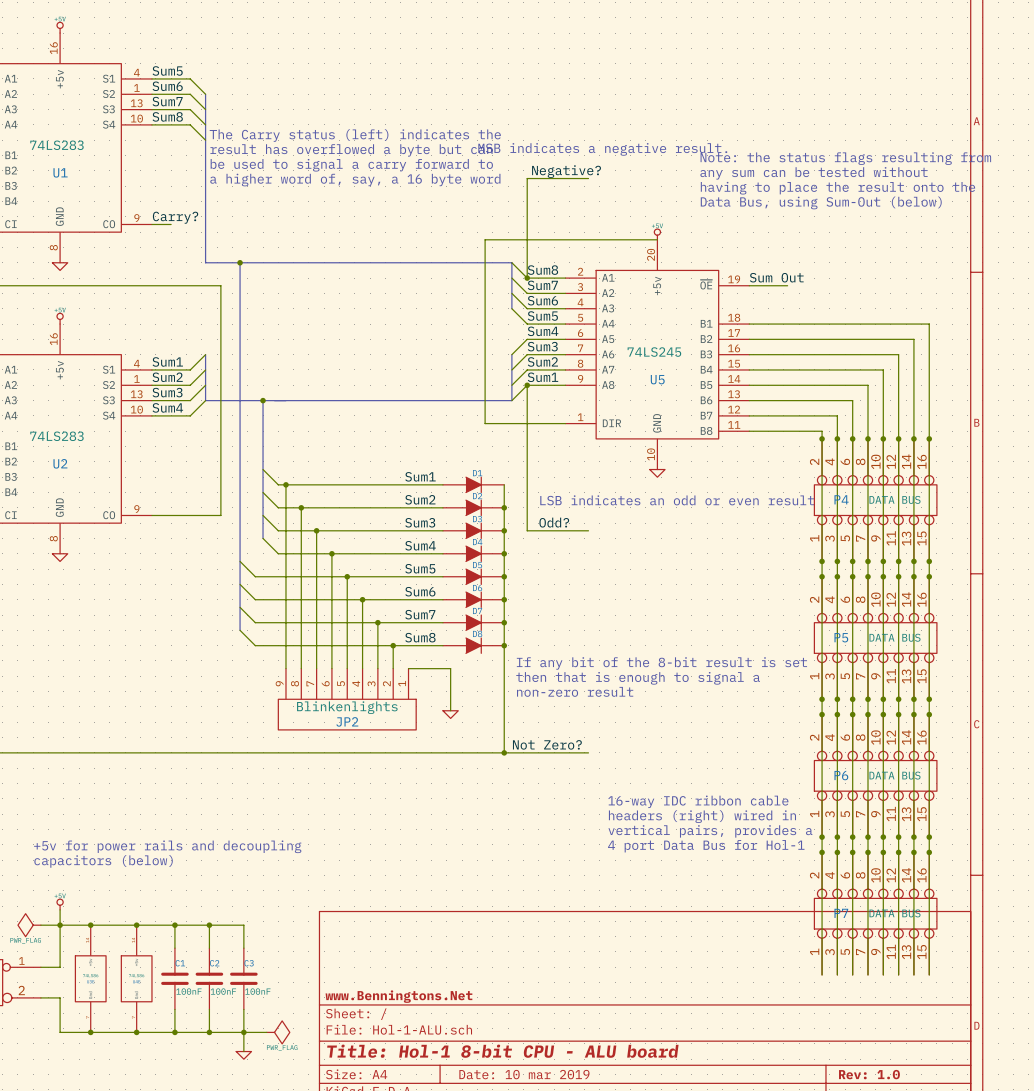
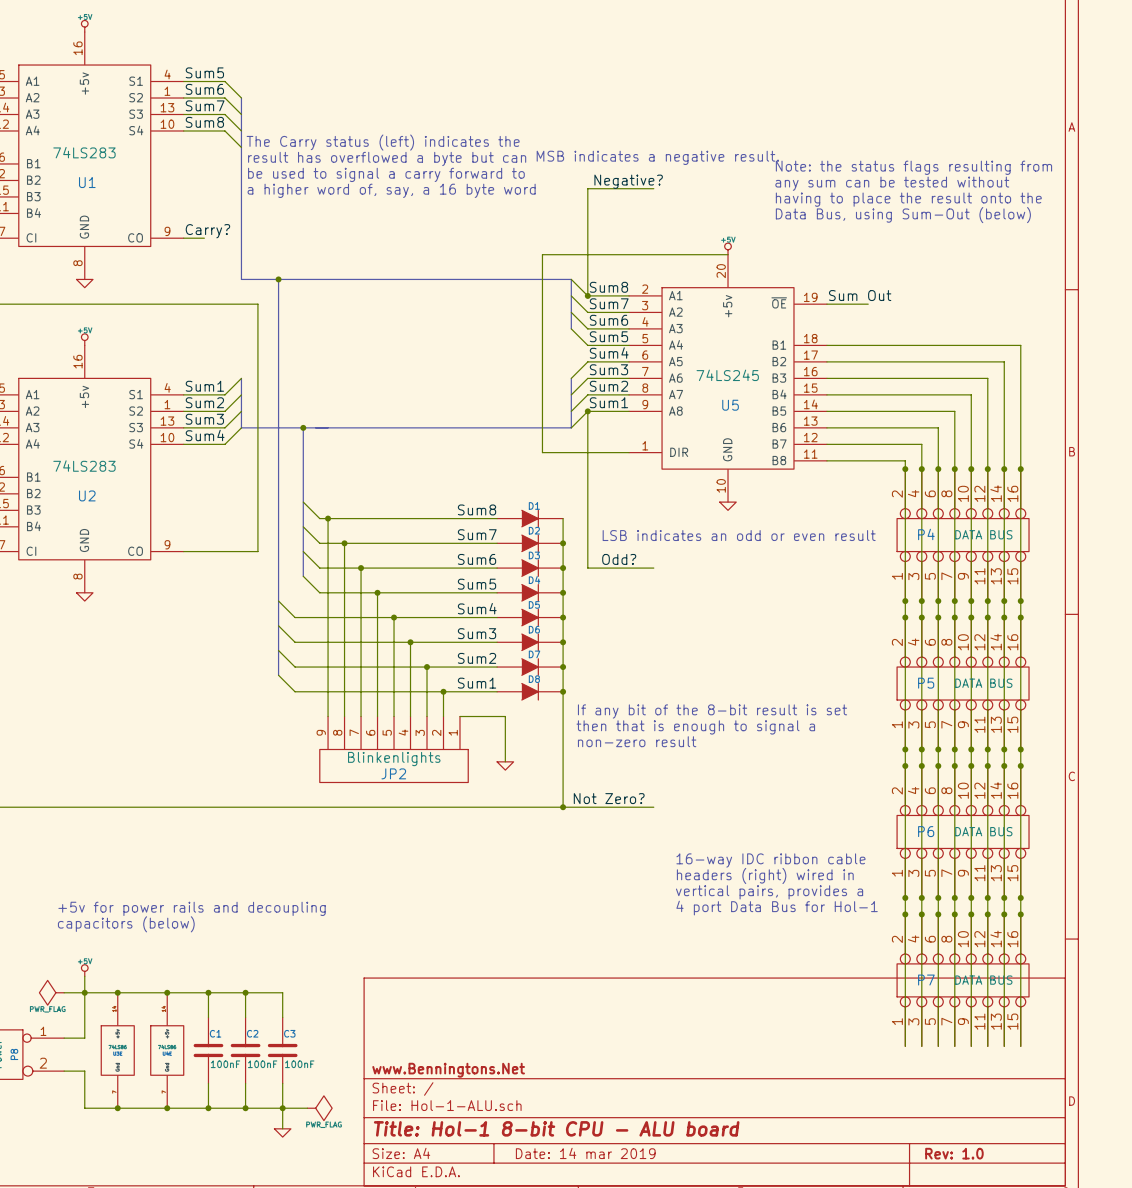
label: Sum1 (420, 476) -> Sum8 (477, 509)
label: Sum2 (420, 499) -> Sum7 (477, 534)
label: Sum3 (420, 522) -> Sum6 (477, 559)
label: Sum4 (420, 545) -> Sum5 (477, 584)
label: Sum5 (420, 568) -> Sum4 (477, 608)
label: Sum6 (420, 591) -> Sum3 (477, 633)
label: Sum7 (420, 614) -> Sum2 (477, 658)
label: Sum8 (420, 637) -> Sum1 (477, 683)
title block: Date: 10 mar 2019 (524, 1074) -> Date: 14 mar 2019 (585, 1153)

